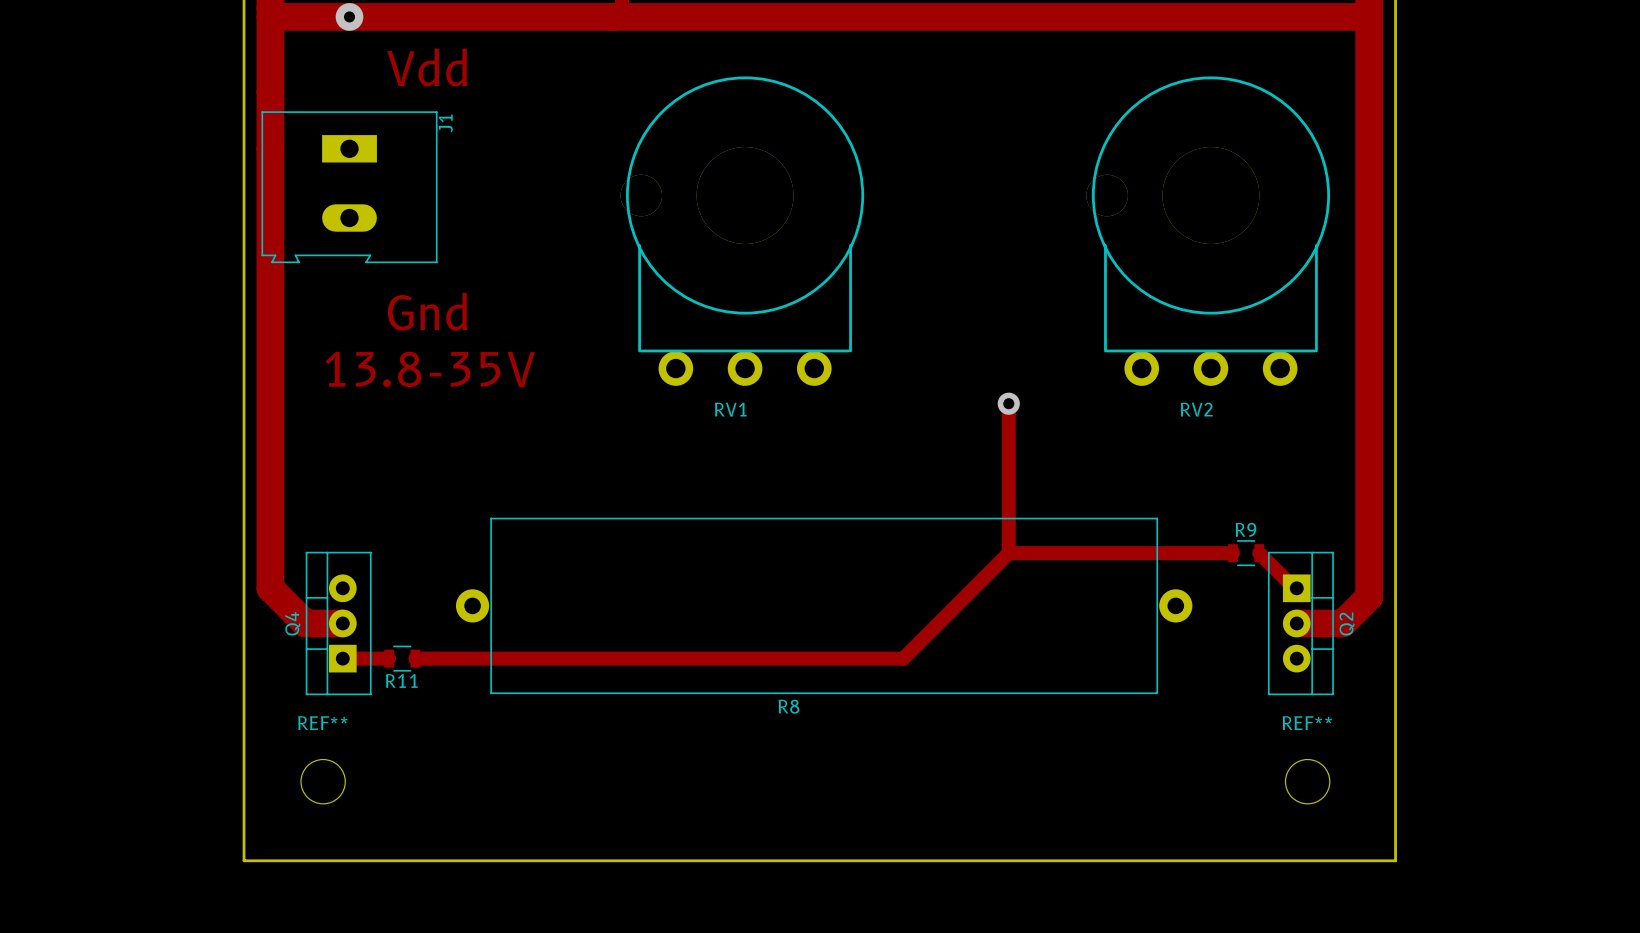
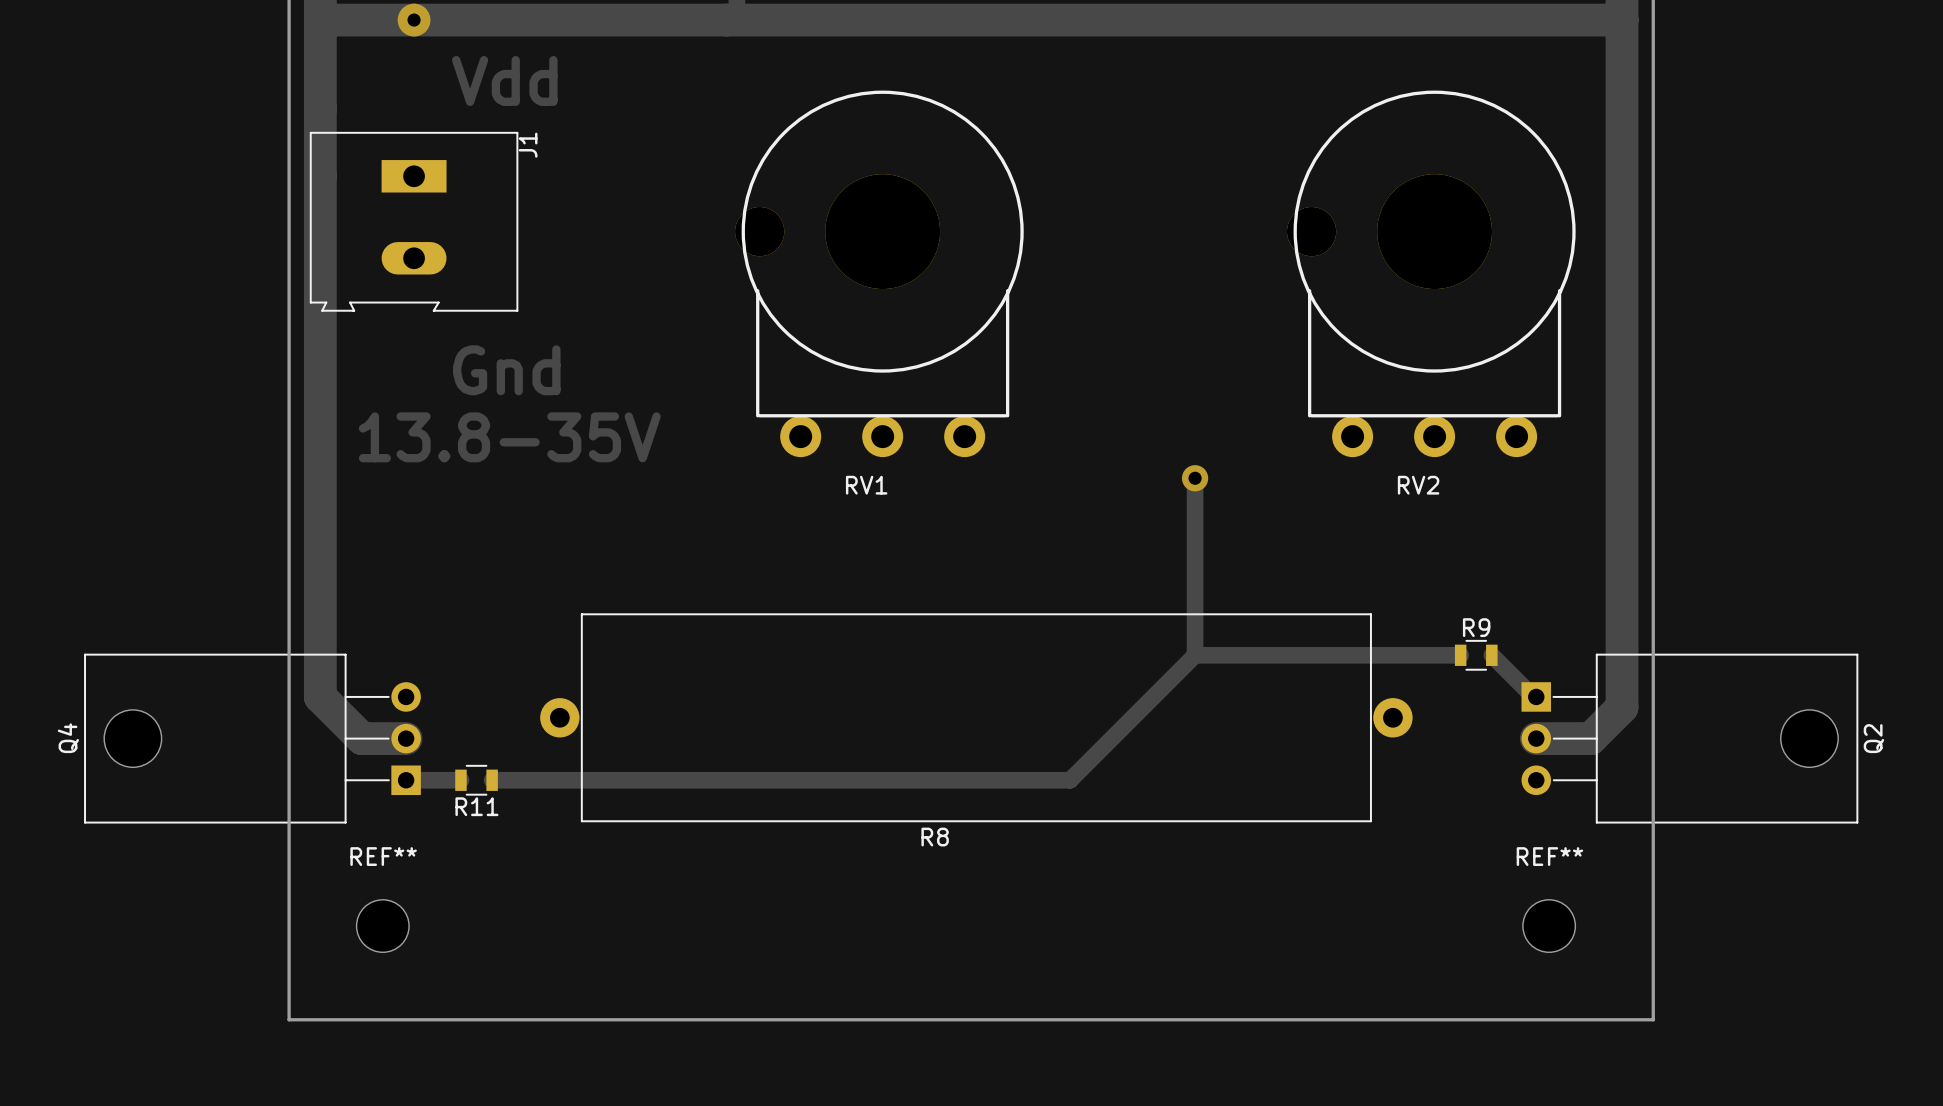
Q4 footprint: [305, 551, 372, 696] -> [84, 653, 421, 824]
Q2 footprint: [1267, 551, 1334, 696] -> [1521, 653, 1859, 824]
Q4 name position: Q4 (292, 623) -> Q4 (68, 738)
Q2 name position: Q2 (1347, 624) -> Q2 (1873, 738)

